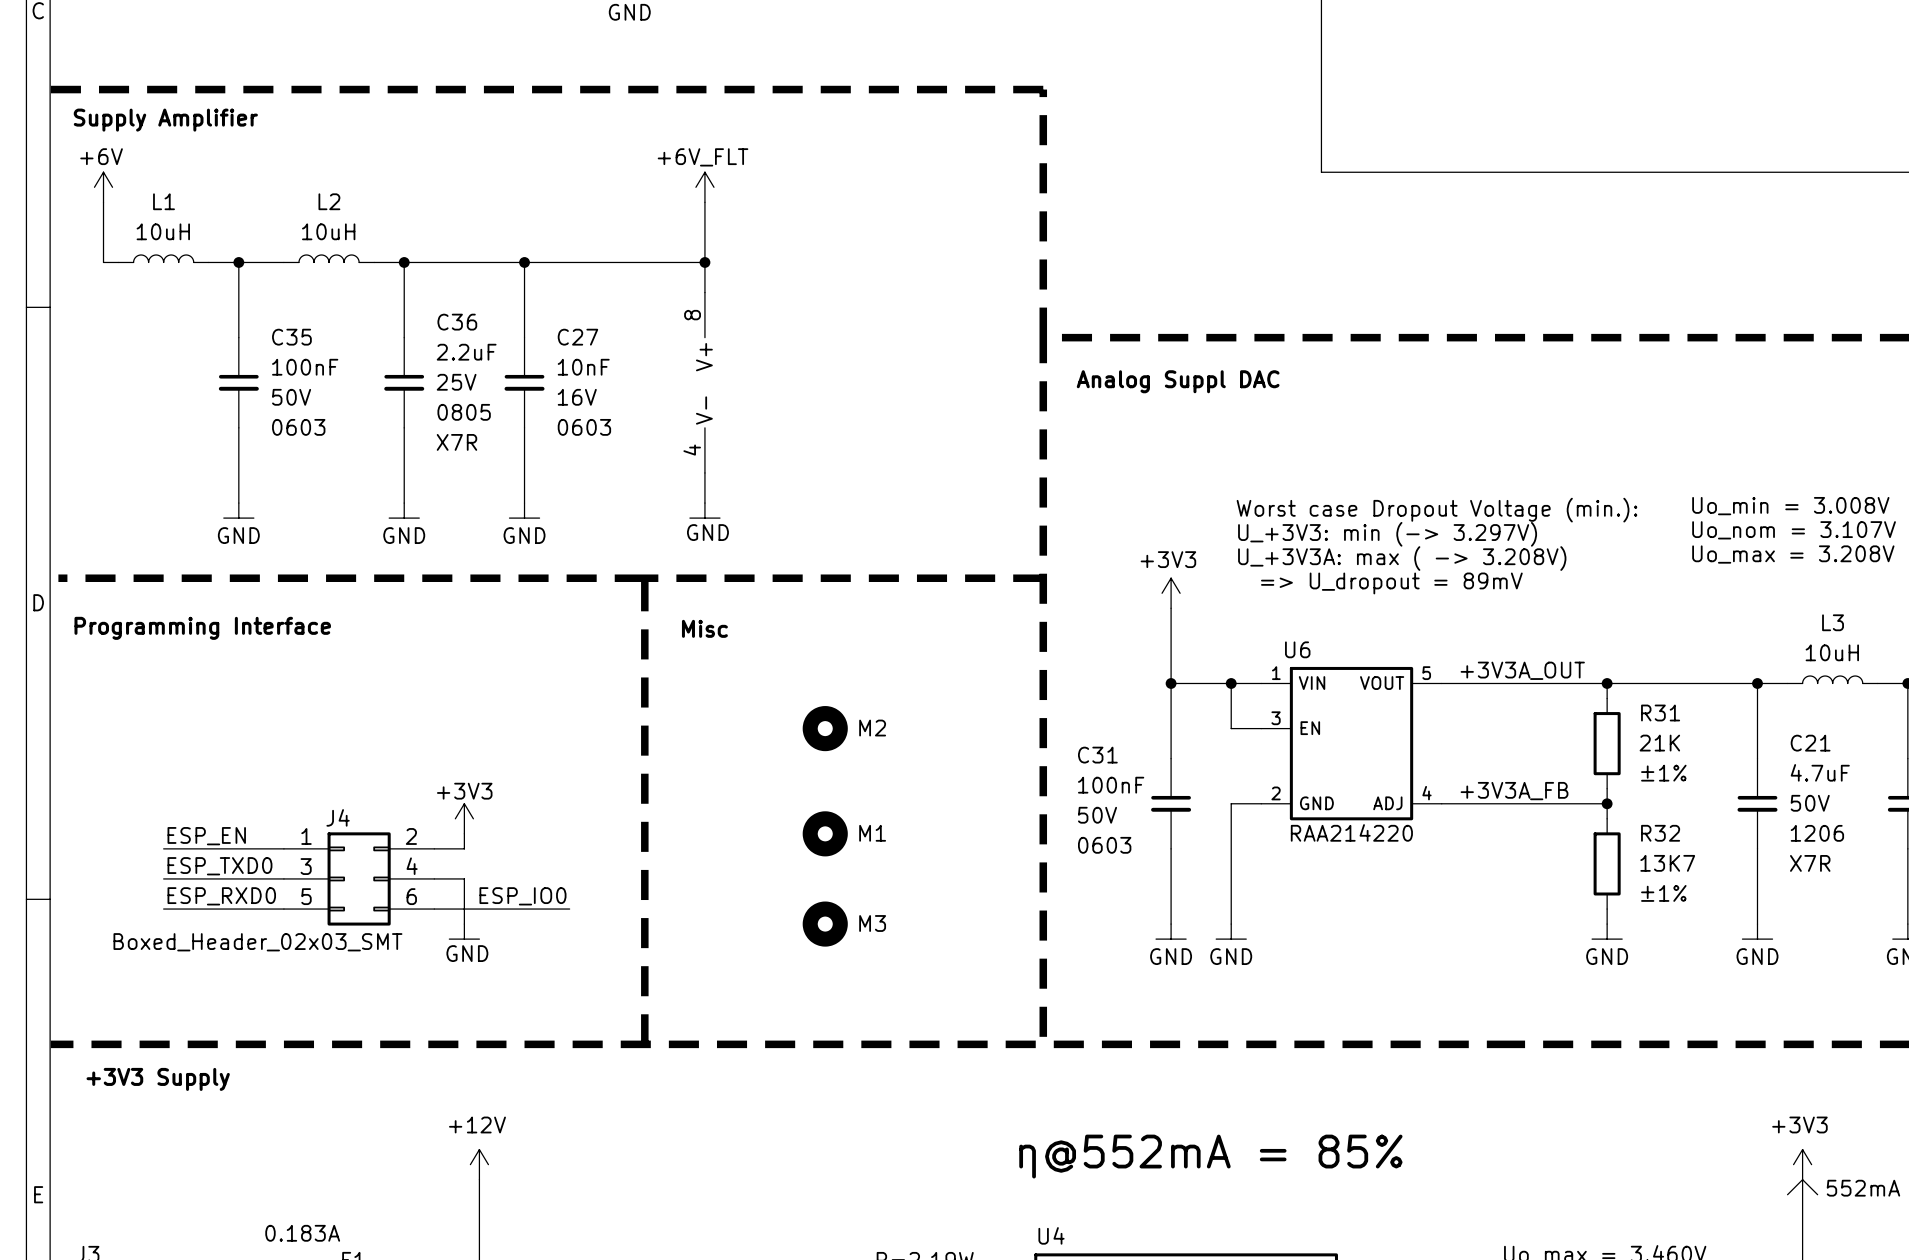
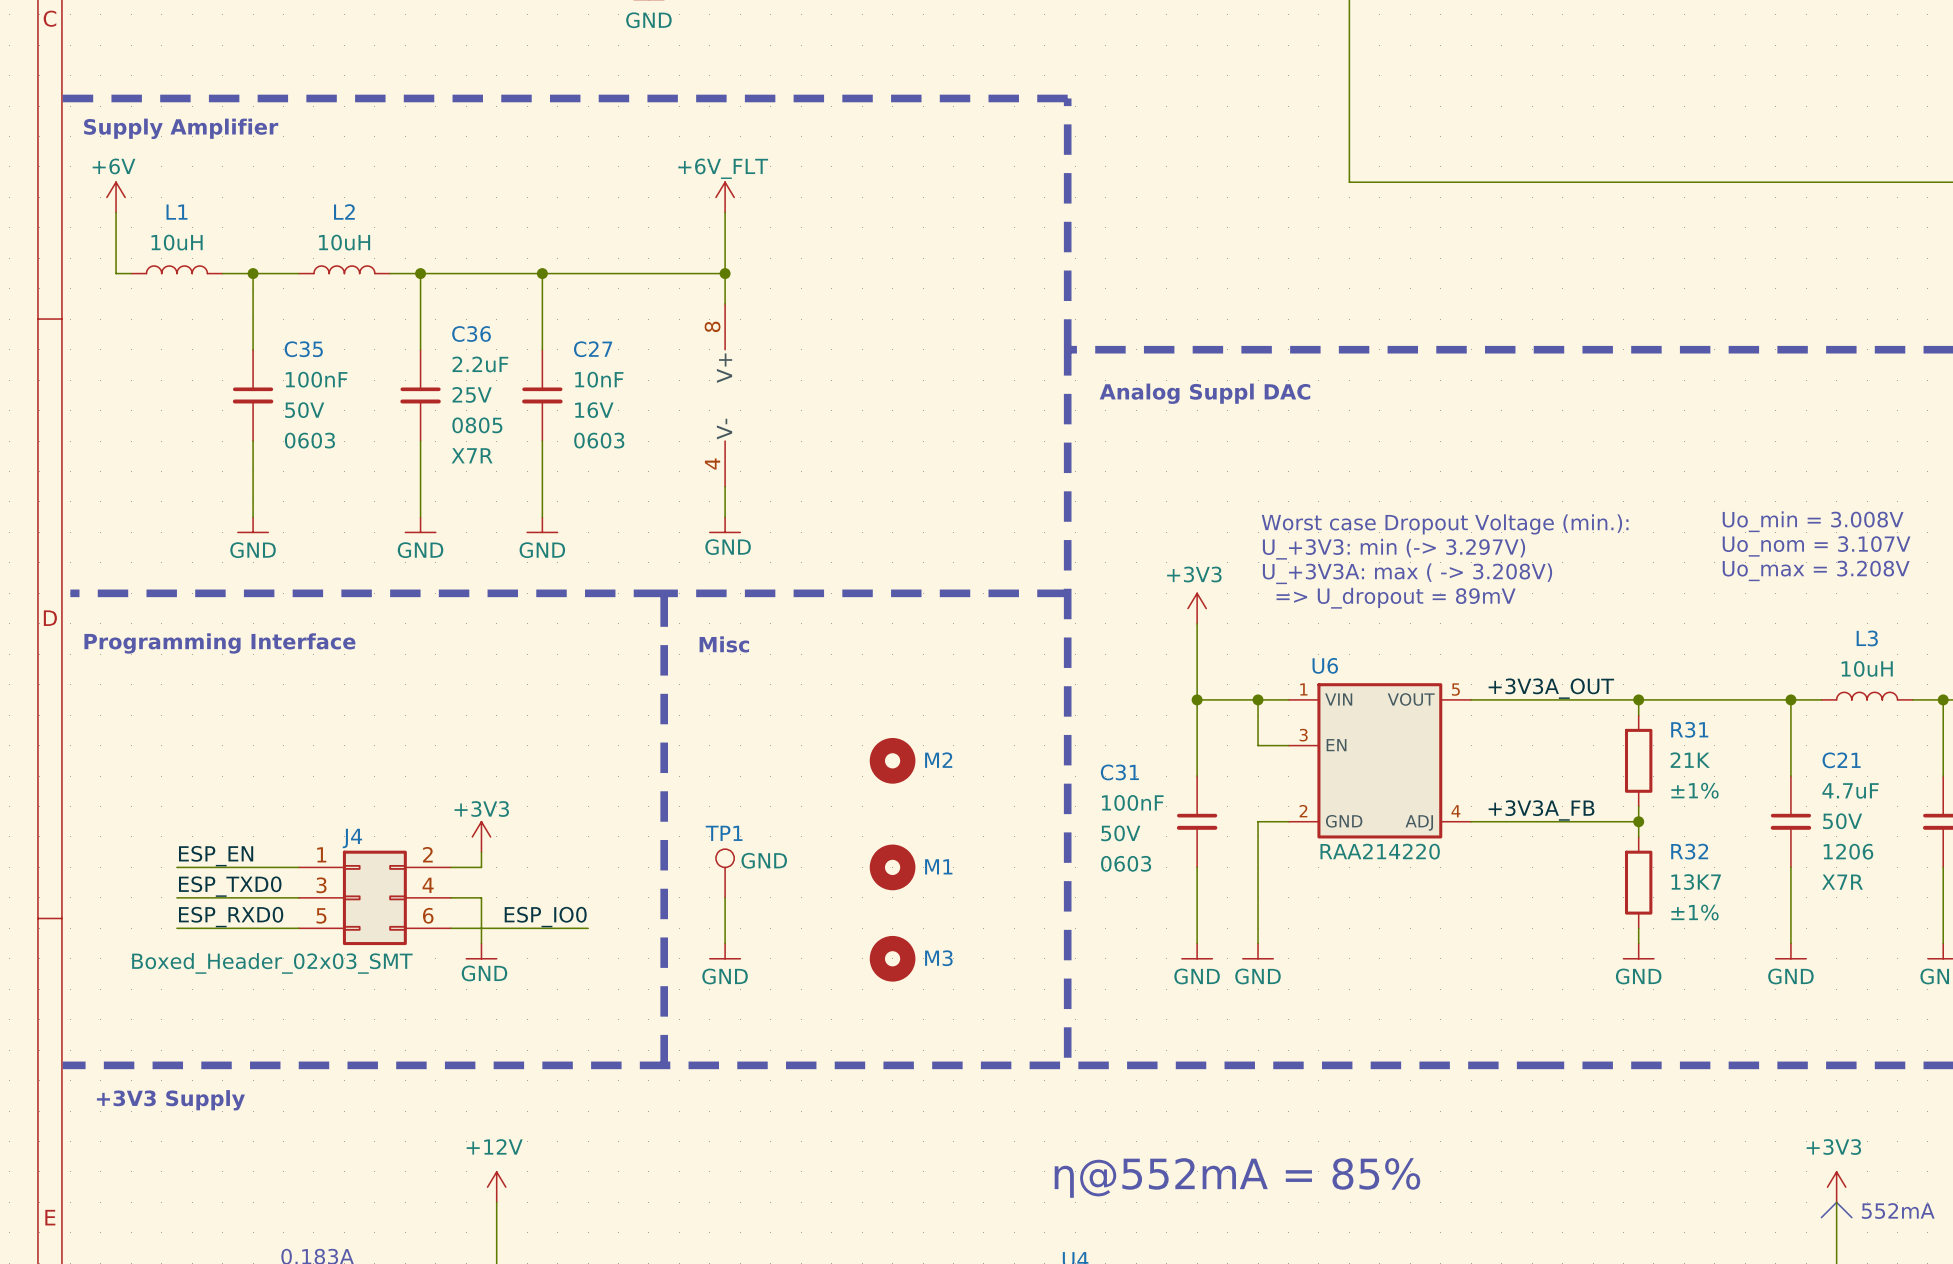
M2 position: (825, 728) -> (892, 760)
M1 position: (825, 833) -> (892, 867)
TP1: none -> (725, 873)
wire: none -> (725, 897) (725, 943)
M3 position: (825, 924) -> (892, 958)
power symbol: none -> GND (725, 951)

